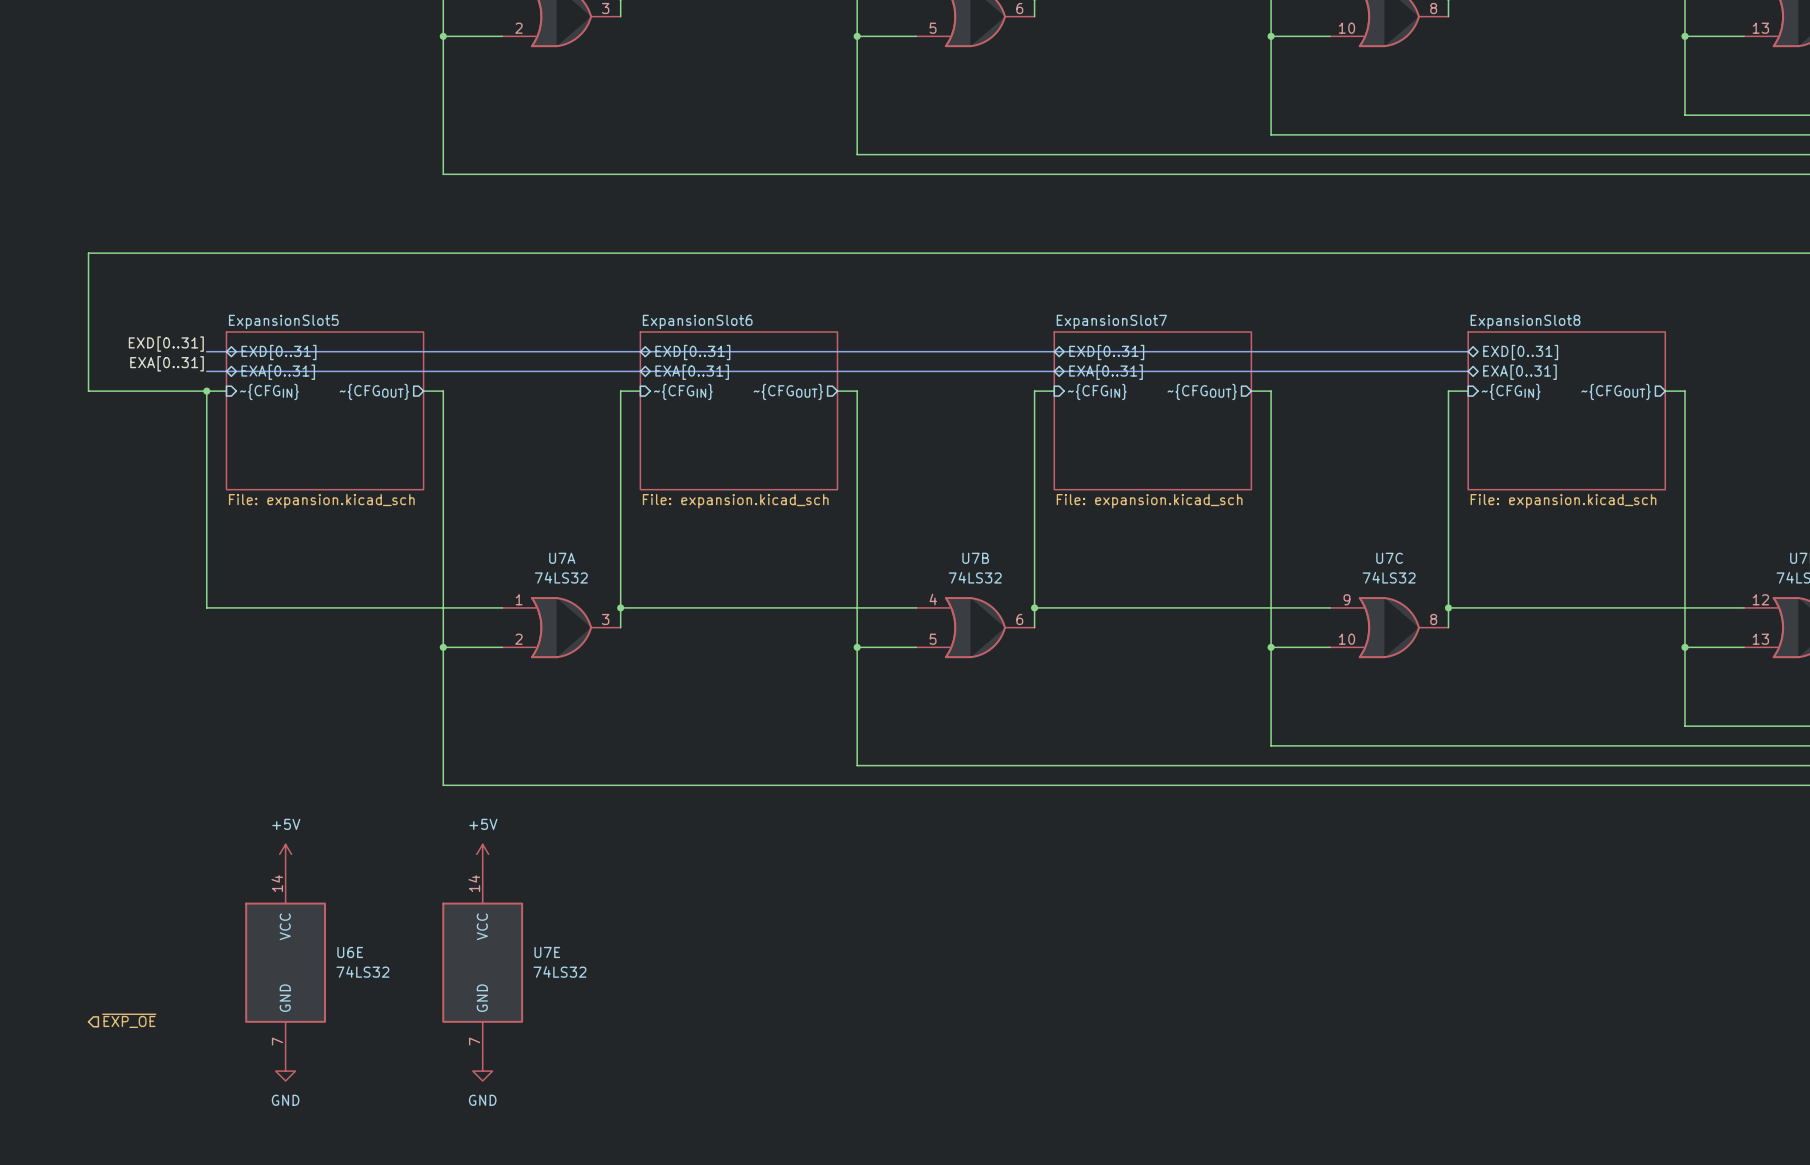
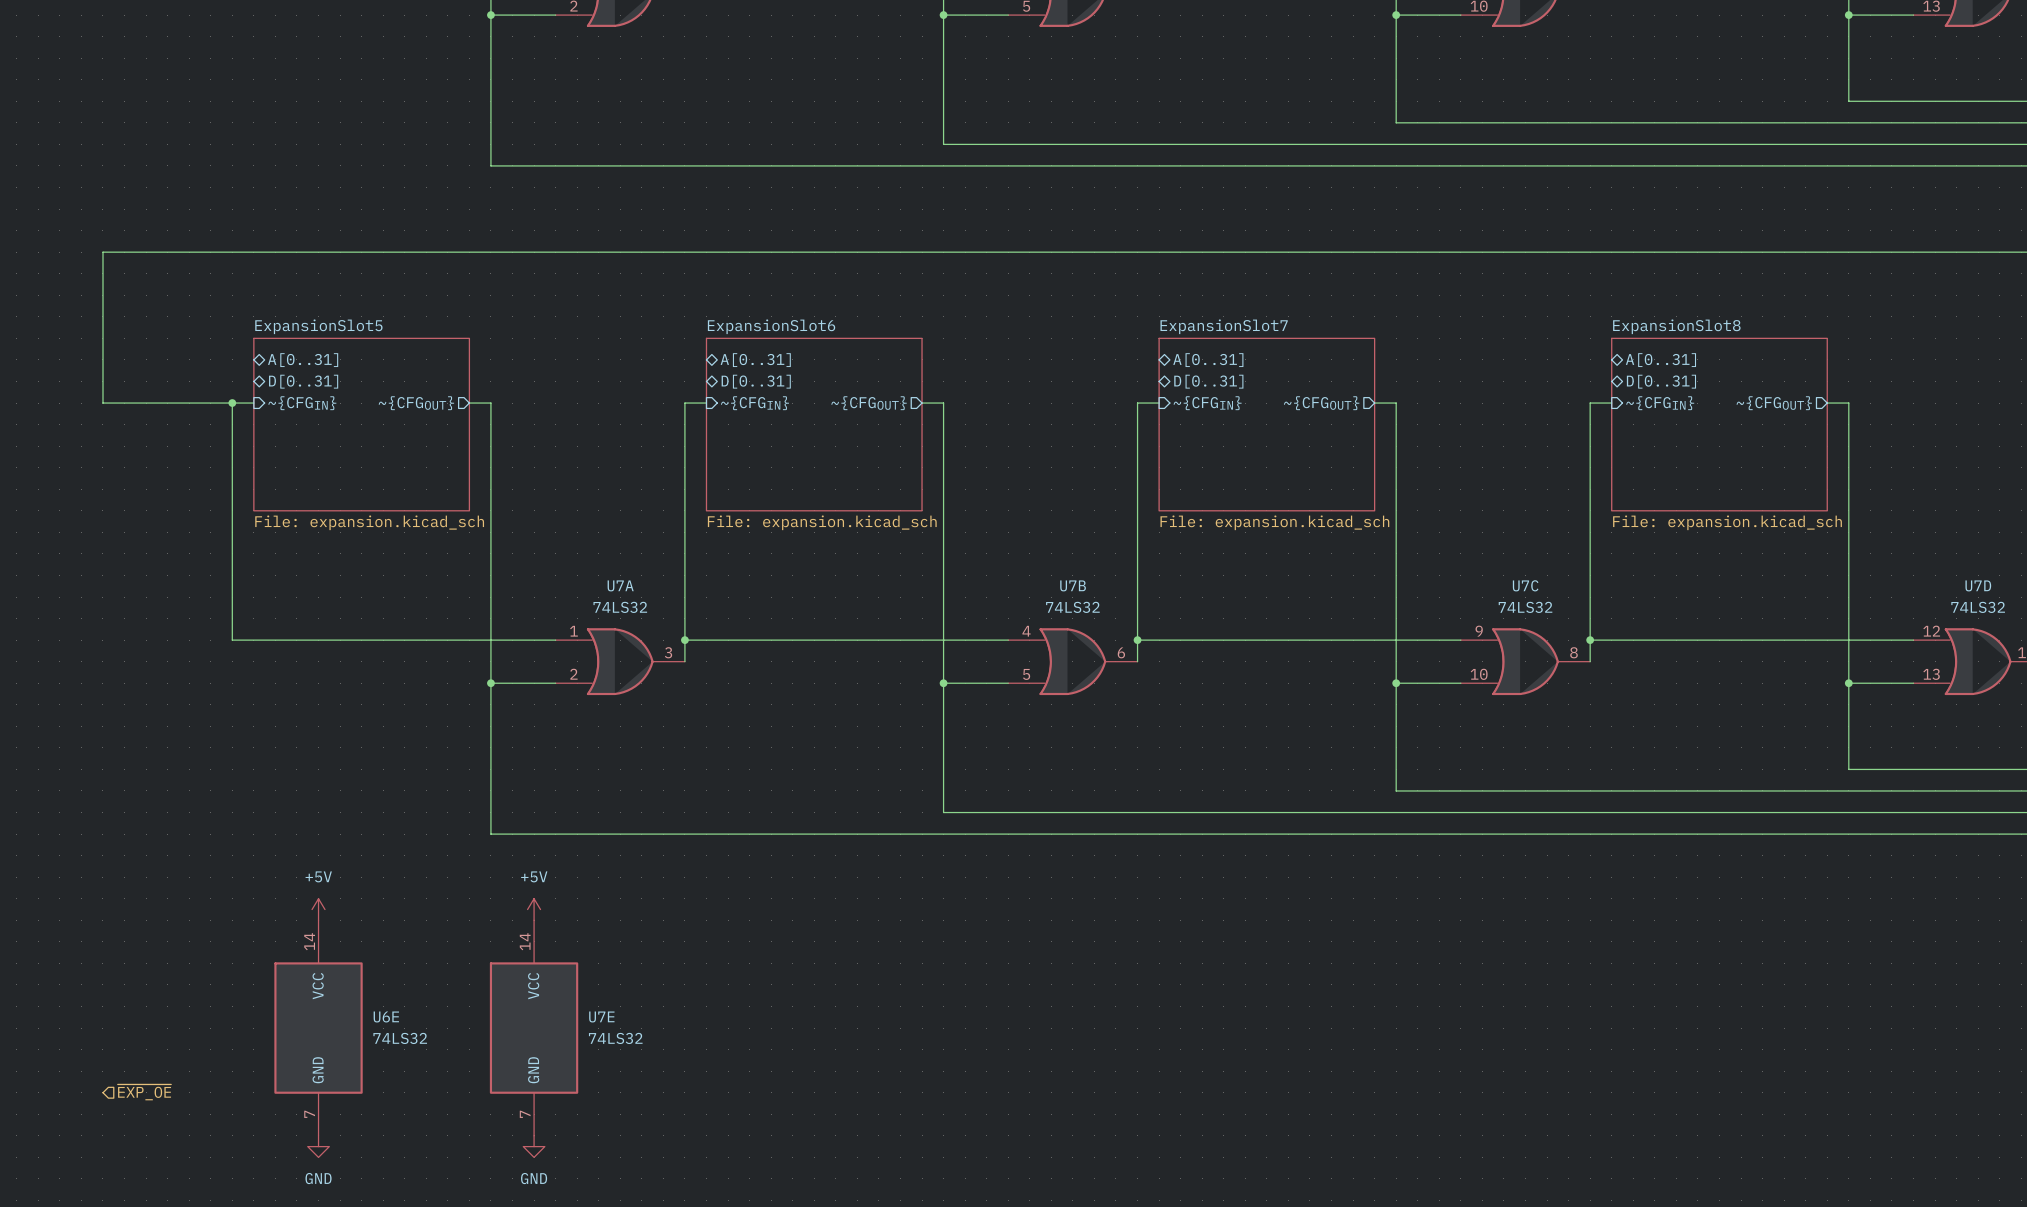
label: EXD[0..31] (166, 344) -> none
bus: (206, 351) (1468, 351) -> none
sheet pin: EXD[0..31] (278, 352) -> A[0..31] (303, 360)
sheet pin: EXD[0..31] (692, 352) -> A[0..31] (755, 360)
sheet pin: EXD[0..31] (1106, 352) -> A[0..31] (1208, 360)
sheet pin: EXD[0..31] (1520, 352) -> A[0..31] (1660, 360)
label: EXA[0..31] (167, 363) -> none
bus: (206, 371) (1468, 371) -> none
sheet pin: EXA[0..31] (278, 372) -> D[0..31] (303, 381)
sheet pin: EXA[0..31] (692, 372) -> D[0..31] (756, 381)
sheet pin: EXA[0..31] (1106, 372) -> D[0..31] (1208, 381)
sheet pin: EXA[0..31] (1519, 372) -> D[0..31] (1661, 381)

